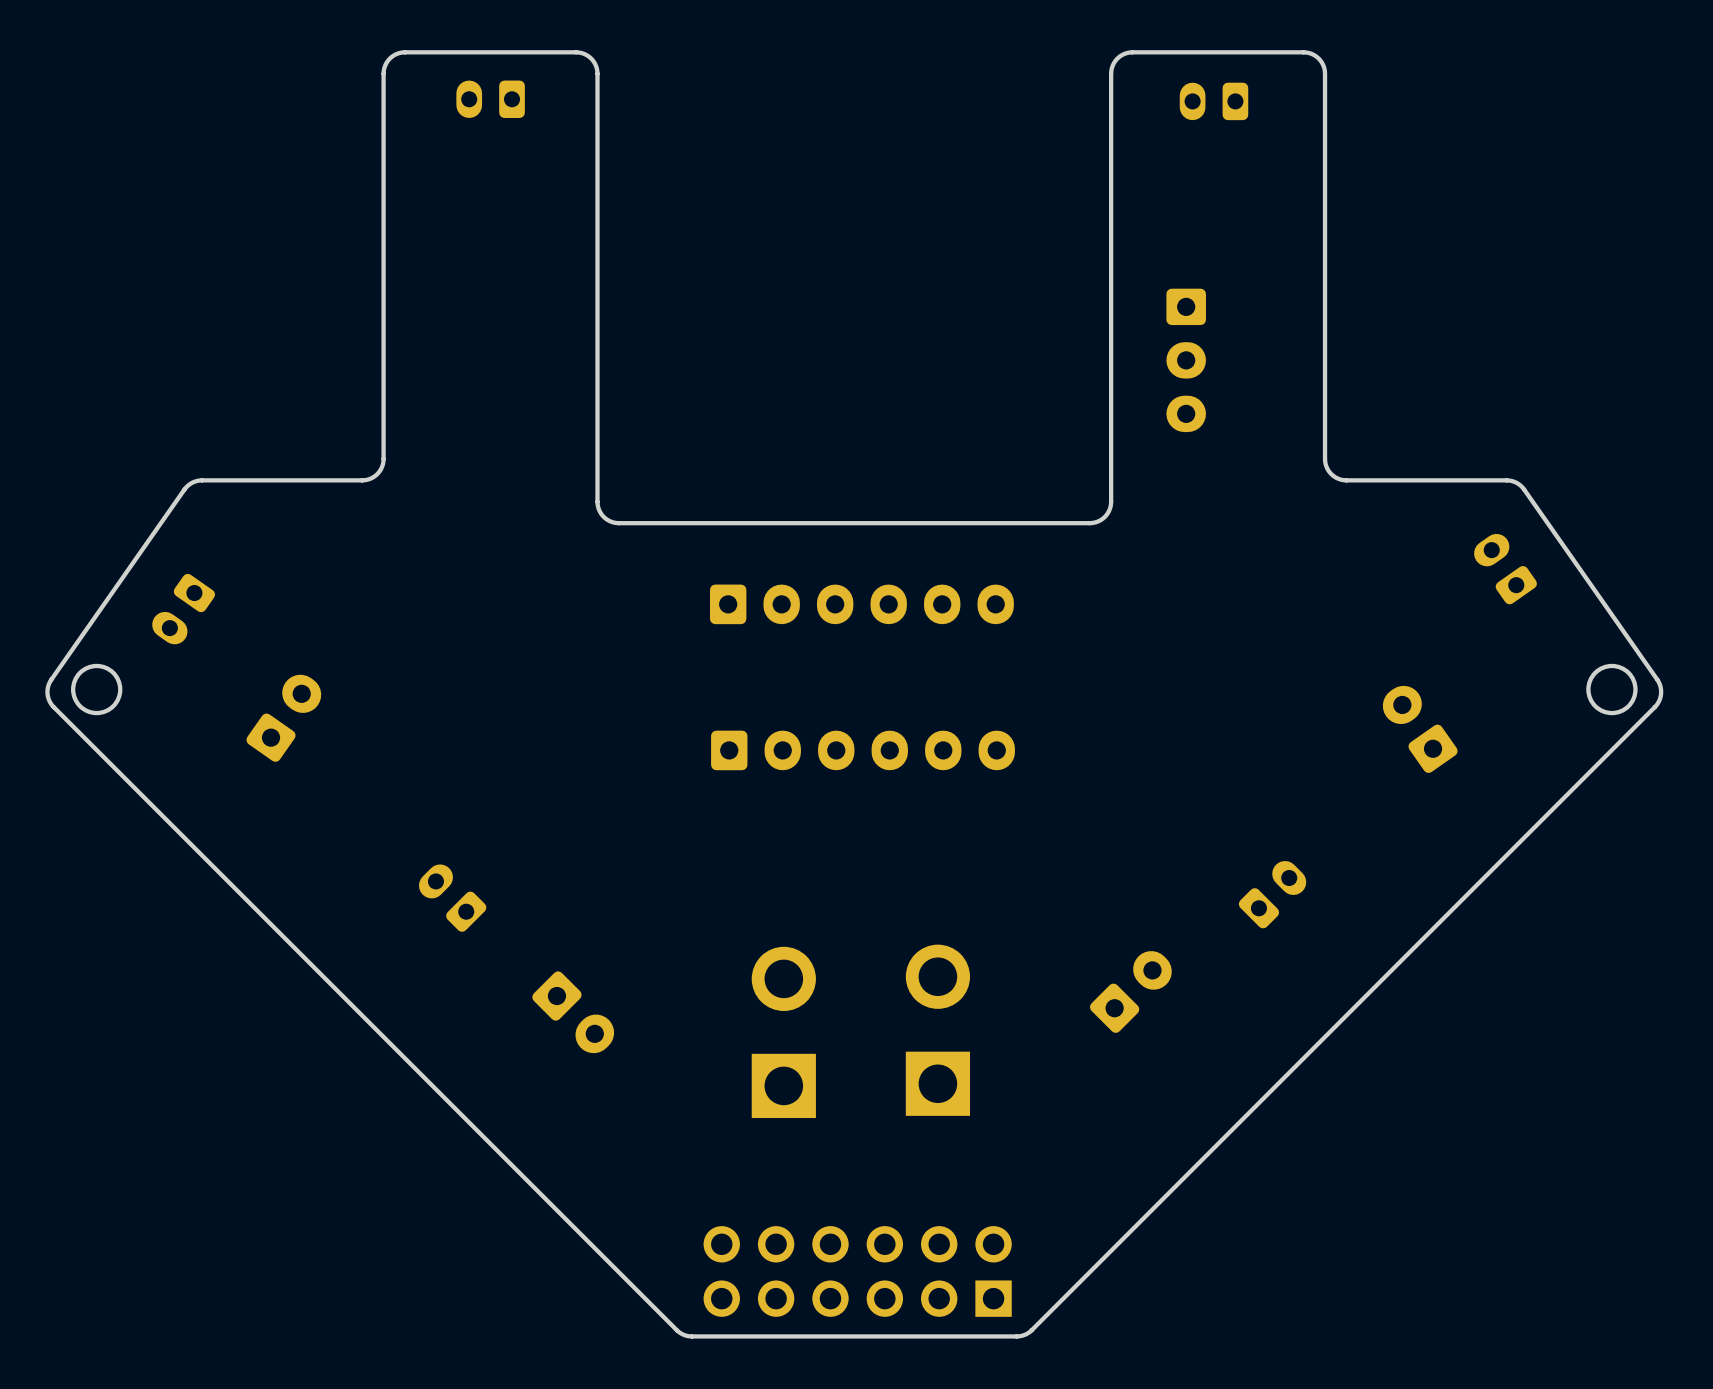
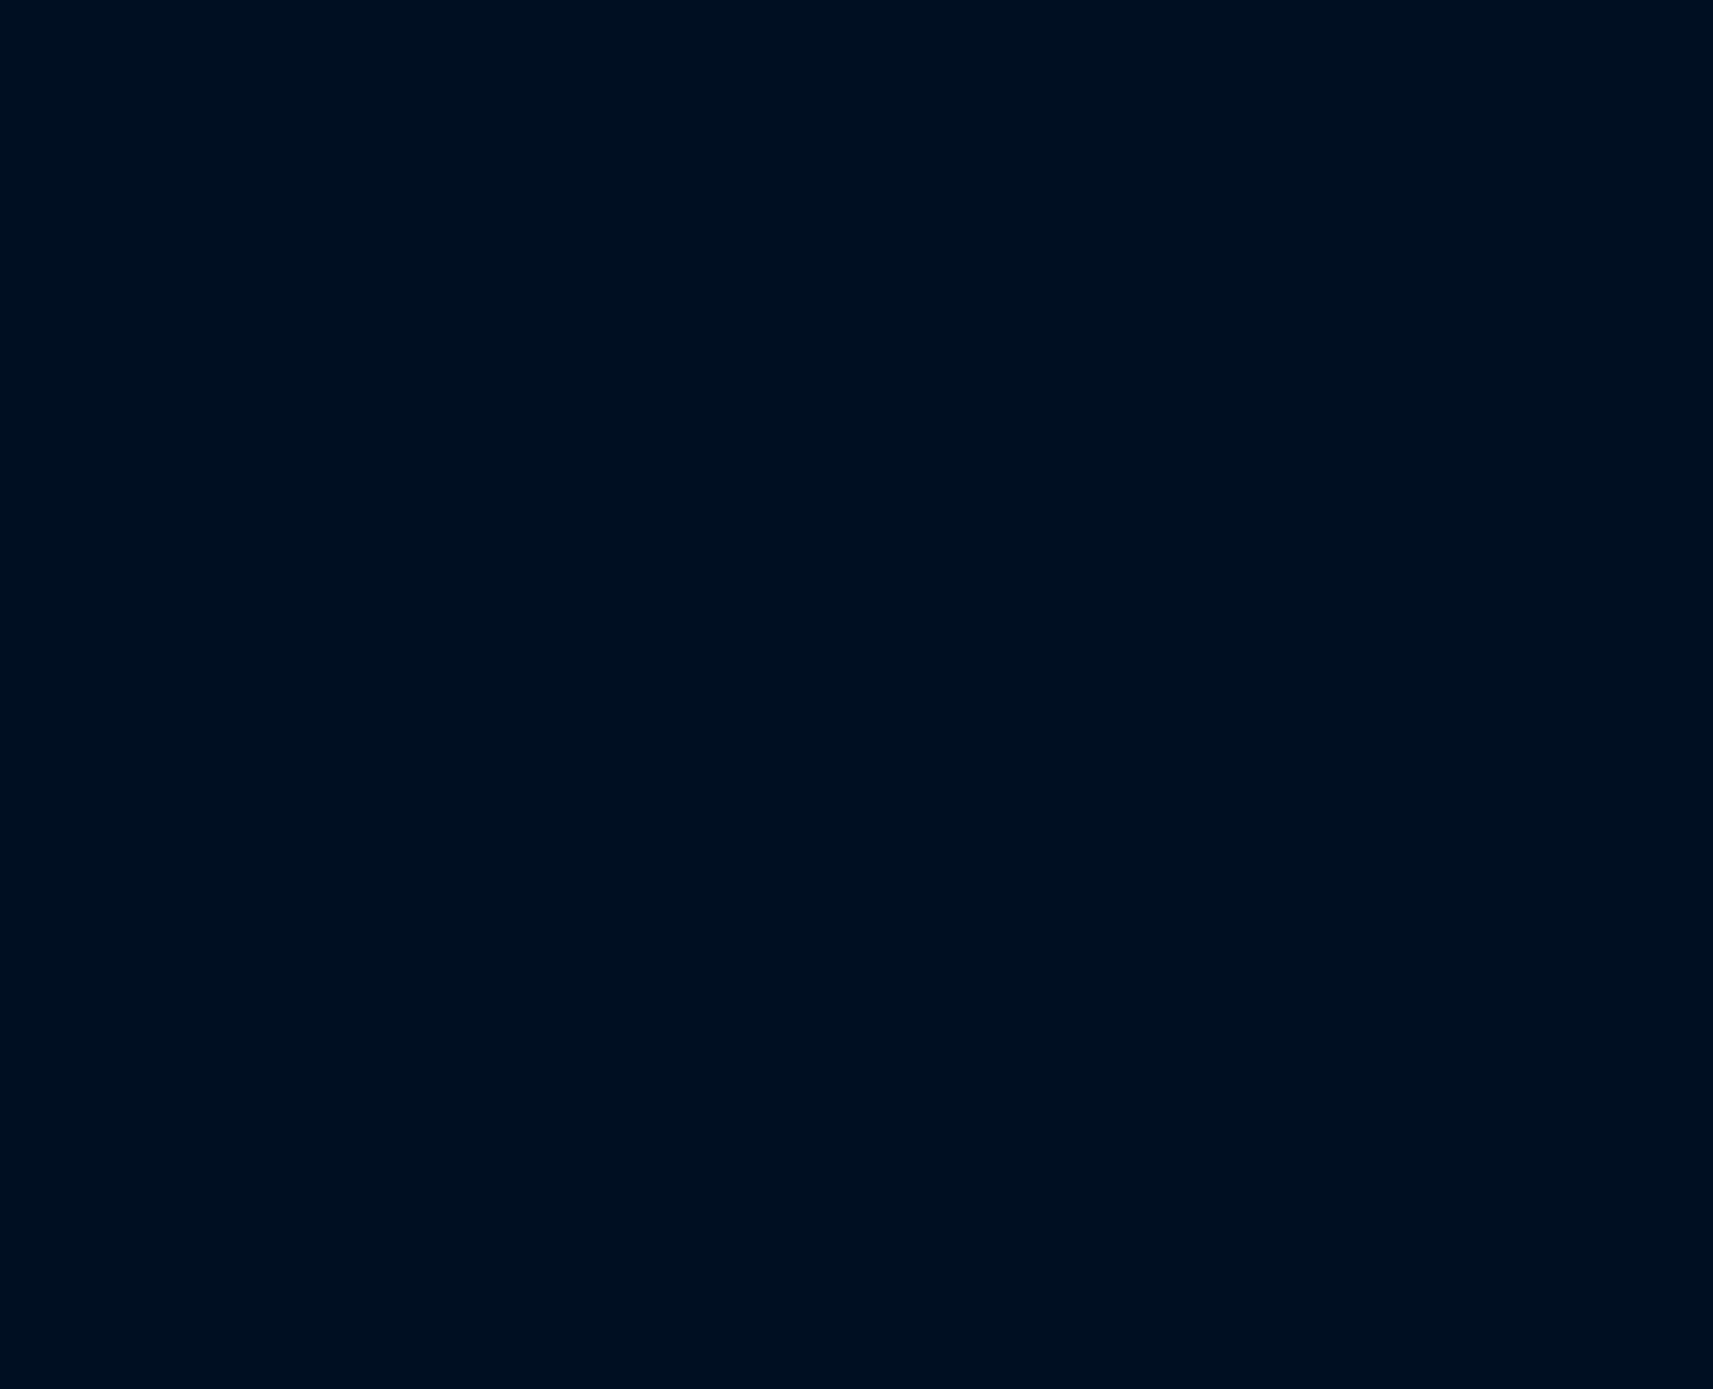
board edge: (1303, 52) (1130, 52) (1121, 55) (1113, 64) (1111, 73) (1111, 501) (1109, 508) (1104, 516) (1099, 521) (1089, 523) (618, 523) (607, 519) (600, 513) (597, 501) (597, 73) (595, 64) (587, 55) (576, 52) (404, 52) (395, 54) (386, 62) (383, 73) (383, 458) (381, 468) (375, 475) (364, 480) (202, 480) (189, 484) (50, 681) (47, 693) (53, 707) (681, 1333) (691, 1336) (1016, 1336) (1028, 1332) (1659, 701) (1660, 688) (1657, 679) (1518, 484) (1506, 480) (1344, 480) (1333, 475) (1327, 468) (1325, 458) (1325, 73) (1323, 65) (1318, 58) (1311, 53) (1303, 52) -> none
part: (490, 99) -> none
part: (1214, 101) -> none
part: (1186, 360) -> none
part: (1505, 569) -> none
part: (861, 604) -> none
part: (183, 609) -> none
round board edge: [71, 663, 123, 716] -> none
round board edge: [1586, 663, 1638, 716] -> none
part: (283, 718) -> none
part: (1420, 729) -> none
part: (863, 750) -> none
part: (1272, 894) -> none
part: (452, 898) -> none
part: (1130, 991) -> none
part: (573, 1012) -> none
part: (937, 1030) -> none
part: (783, 1032) -> none
part: (857, 1271) -> none

